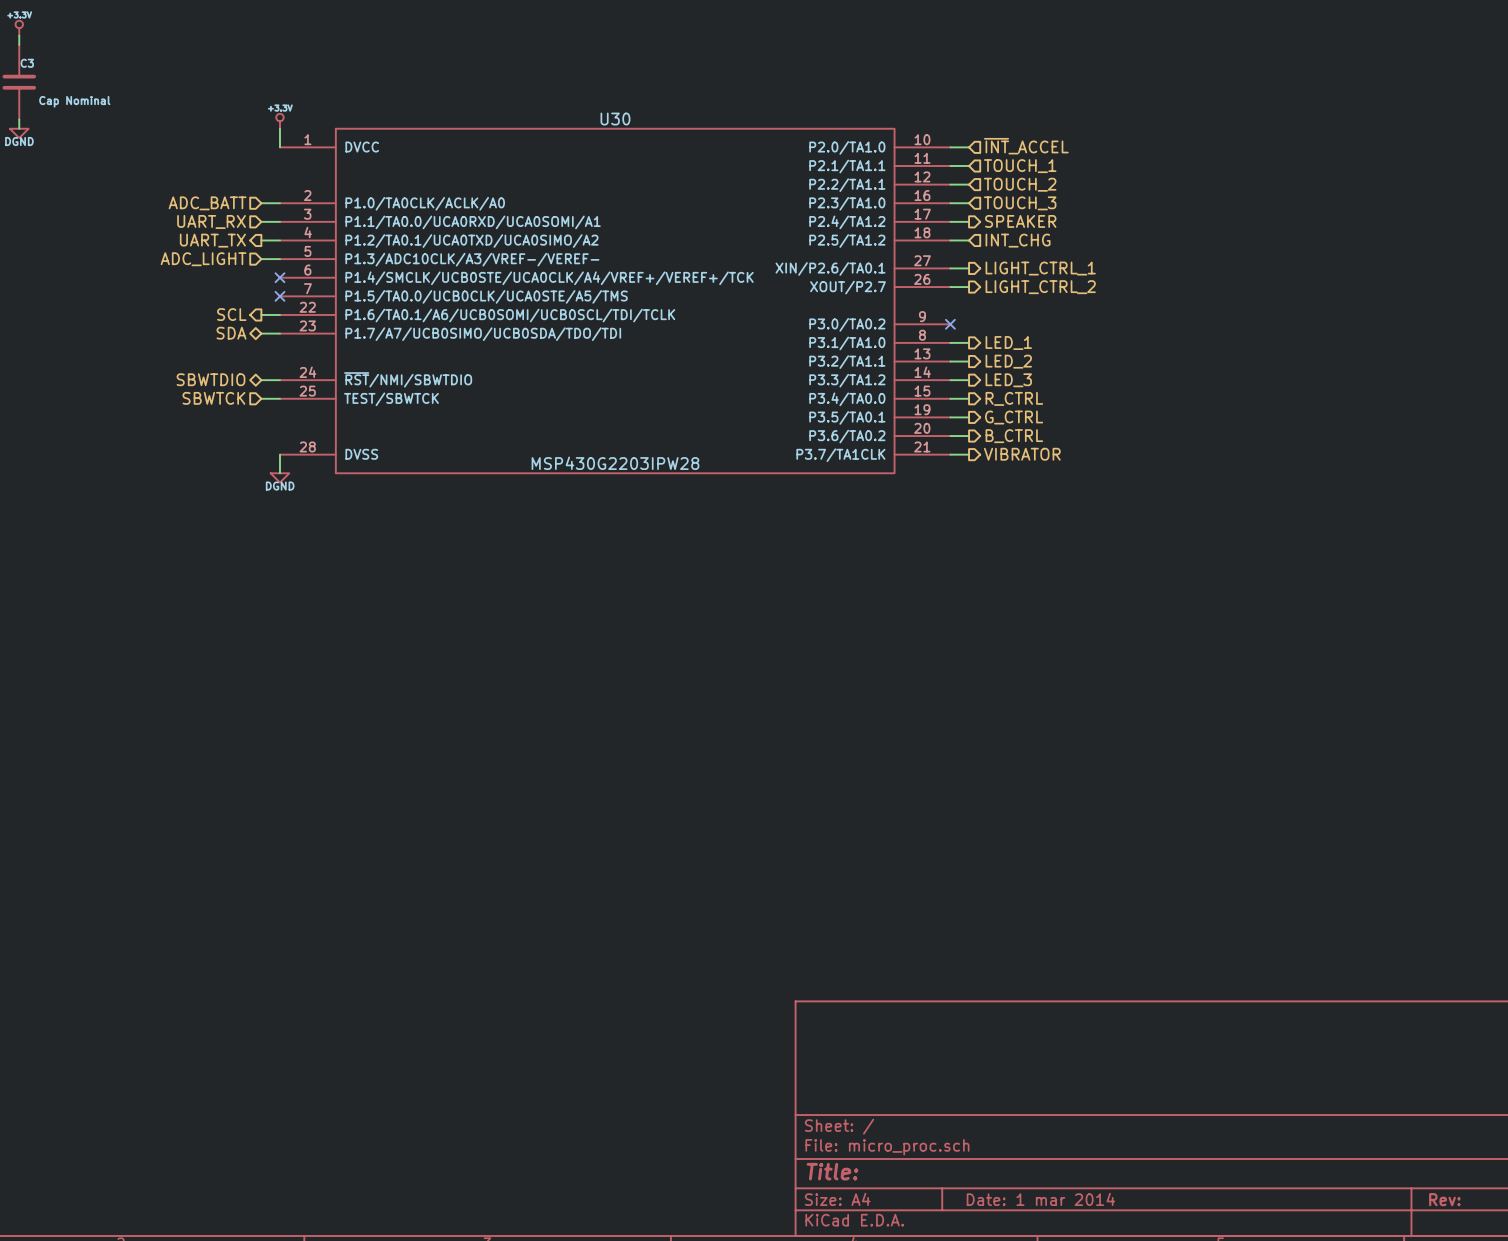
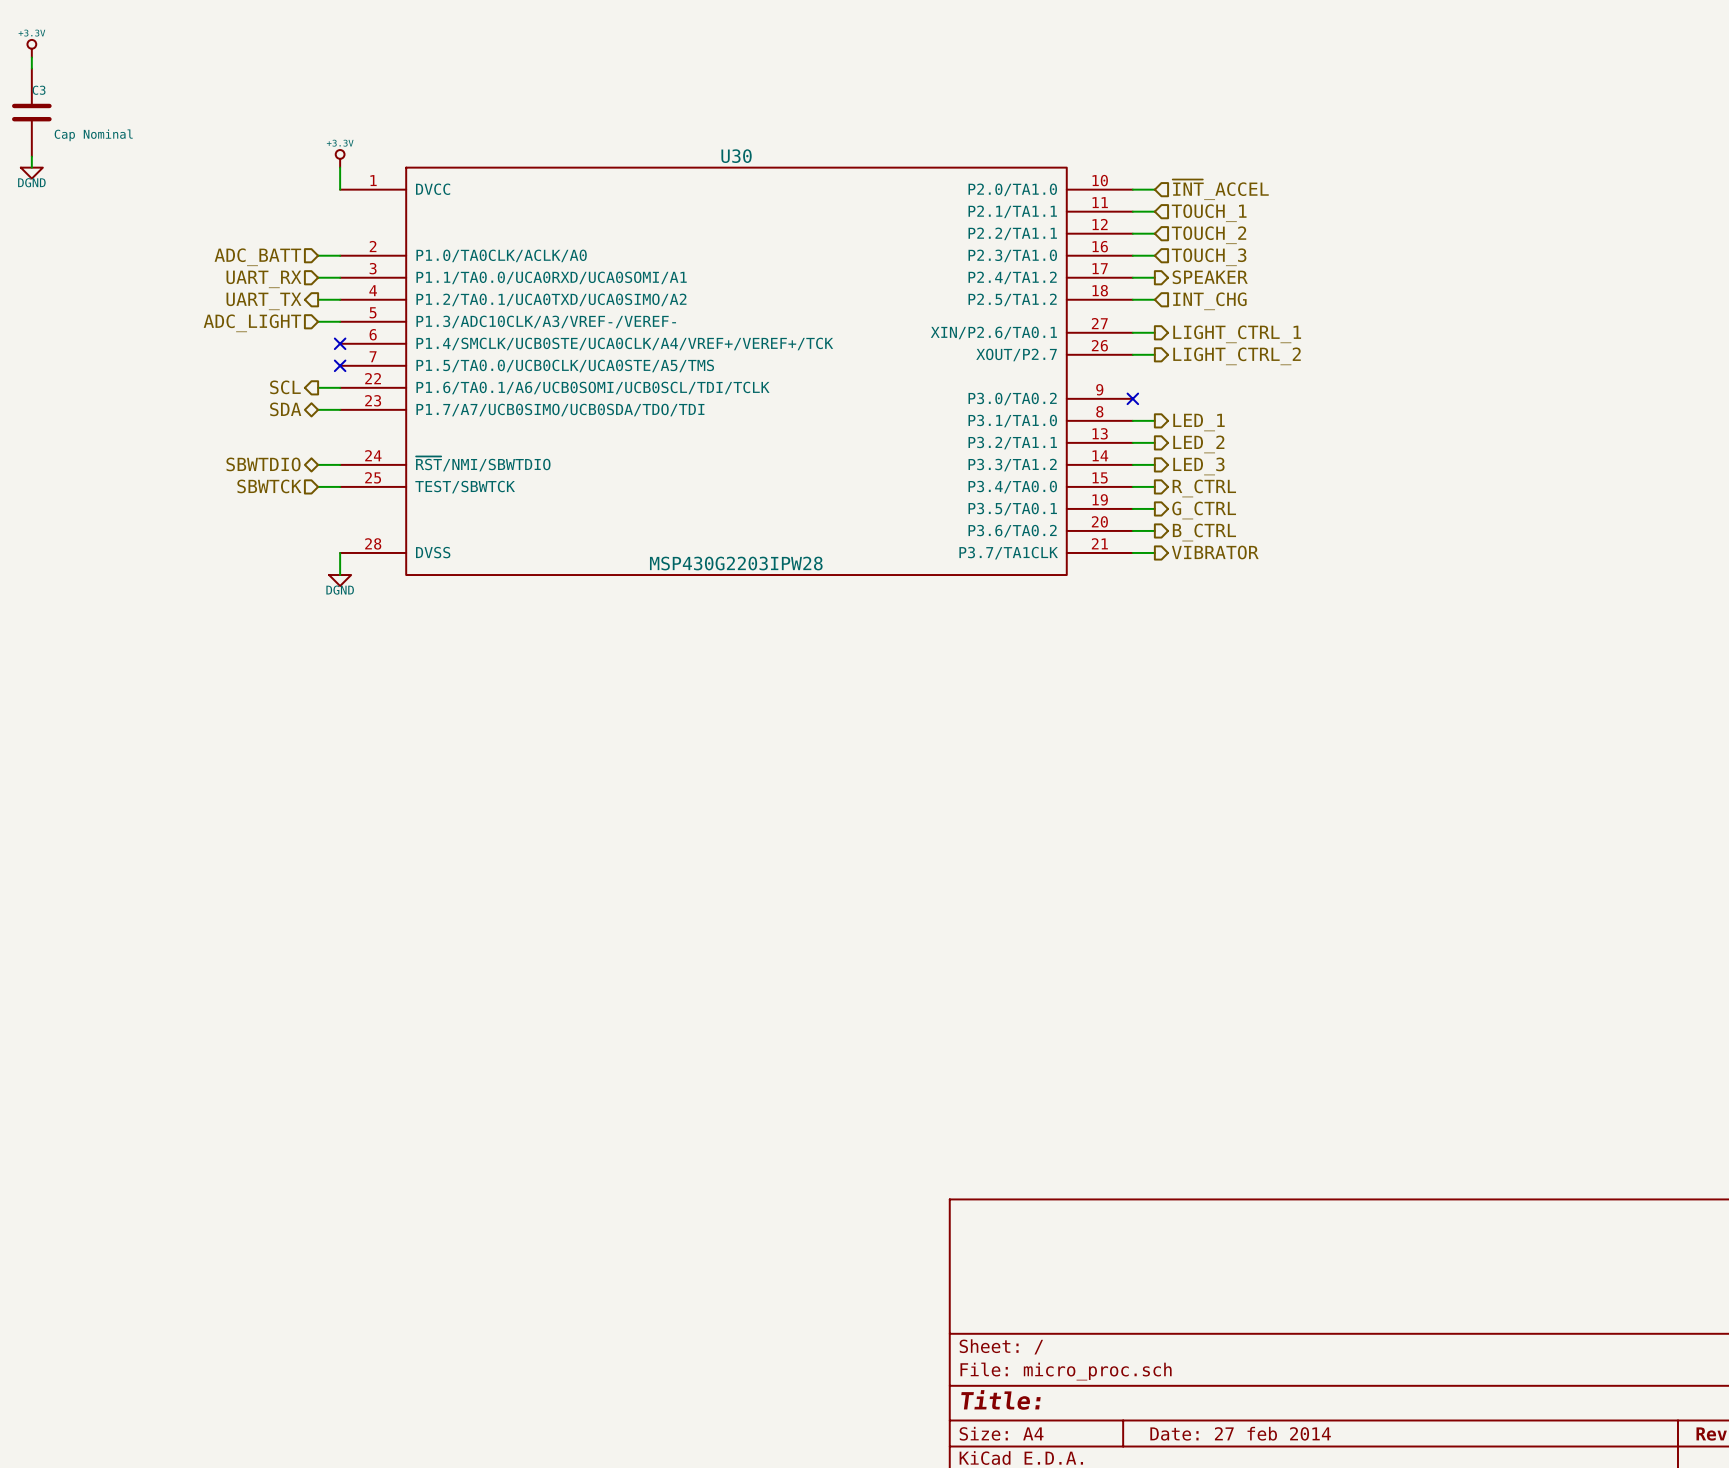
title block: Date: 1 mar 2014 (1040, 1199) -> Date: 27 feb 2014 (1240, 1433)

